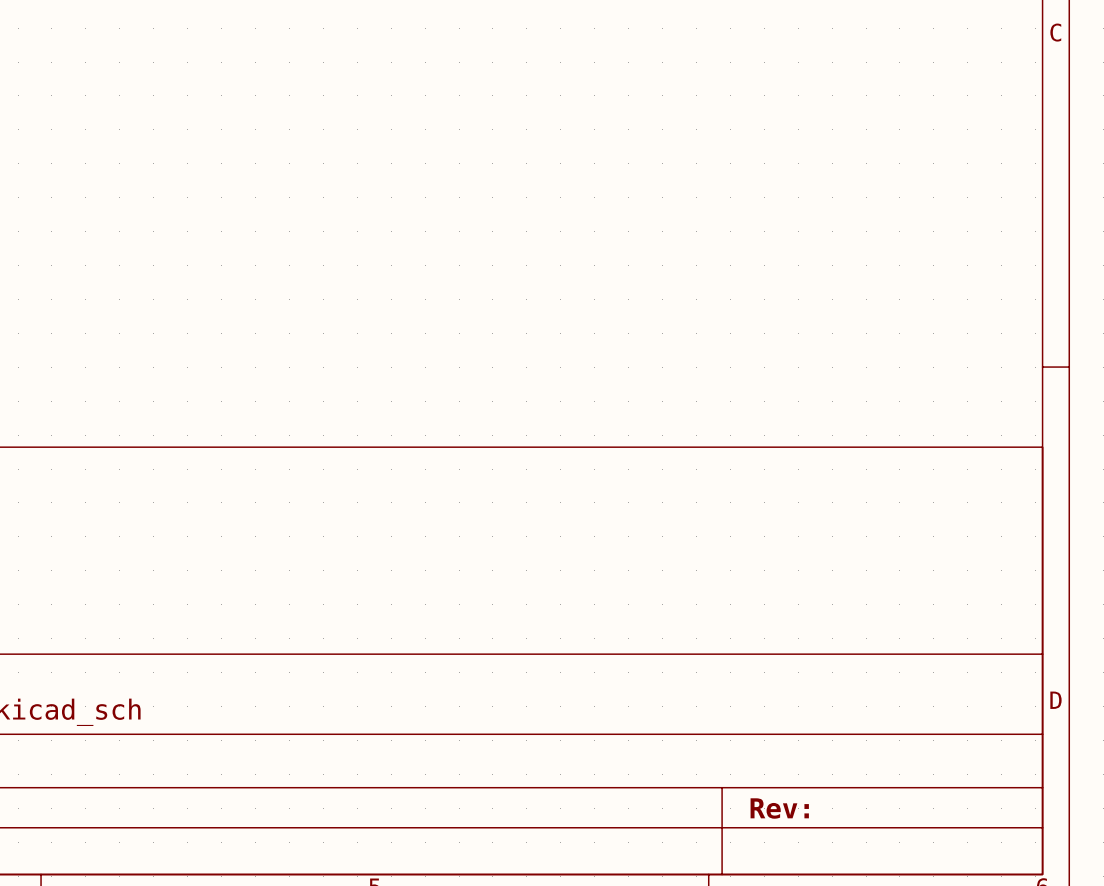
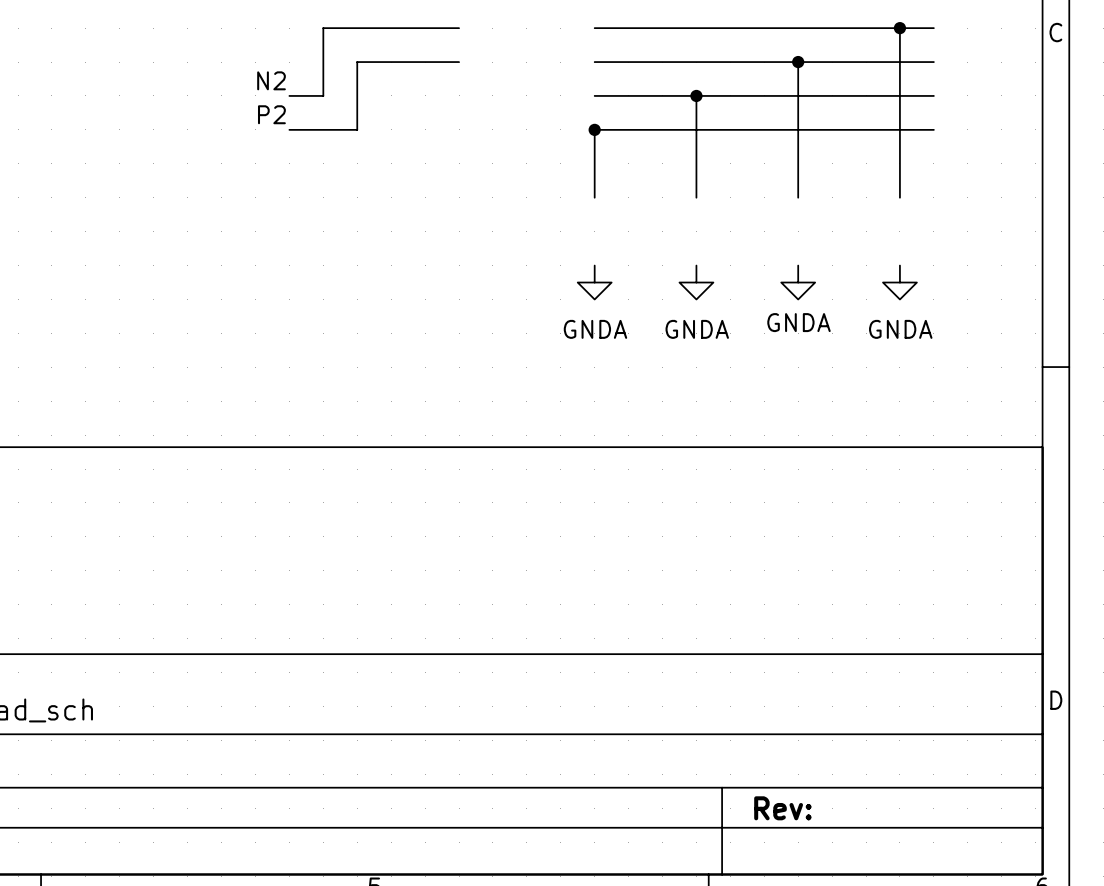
wire: none -> (459, 28) (323, 28) (323, 95) (289, 95)
wire: none -> (594, 28) (933, 28)
wire: none -> (899, 28) (899, 197)
junction: none -> (899, 28)
wire: none -> (459, 62) (357, 62) (357, 129) (289, 129)
wire: none -> (594, 62) (933, 62)
wire: none -> (798, 62) (798, 197)
junction: none -> (798, 62)
label: none -> N2 (271, 80)
wire: none -> (594, 95) (933, 95)
wire: none -> (696, 95) (696, 197)
junction: none -> (696, 95)
label: none -> P2 (271, 114)
junction: none -> (594, 129)
wire: none -> (933, 129) (594, 129) (594, 197)
power symbol: none -> GNDA (594, 282)
power symbol: none -> GNDA (696, 282)
power symbol: none -> GNDA (798, 282)
power symbol: none -> GNDA (899, 282)

